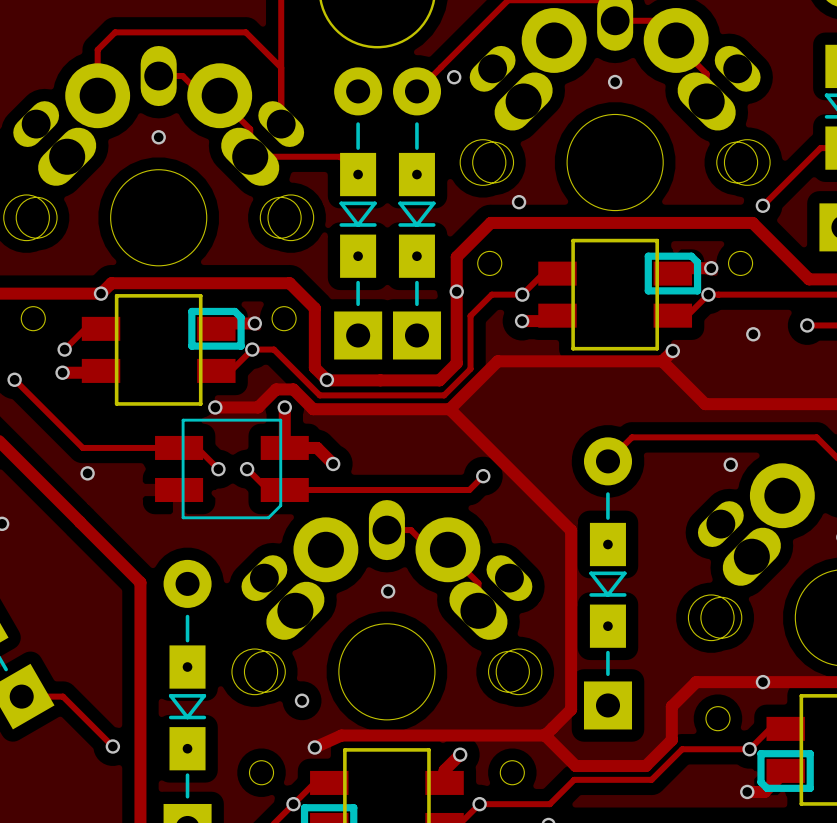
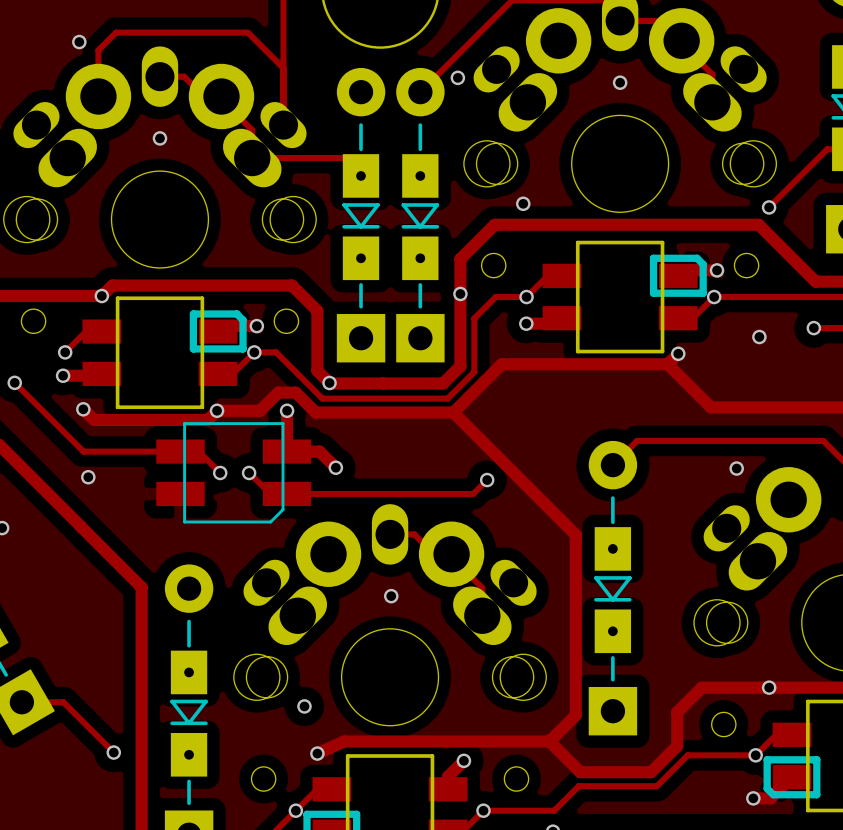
via: none -> (79, 42)
track: none -> (83, 409) (93, 419) (207, 419) (217, 410)
via: none -> (83, 409)

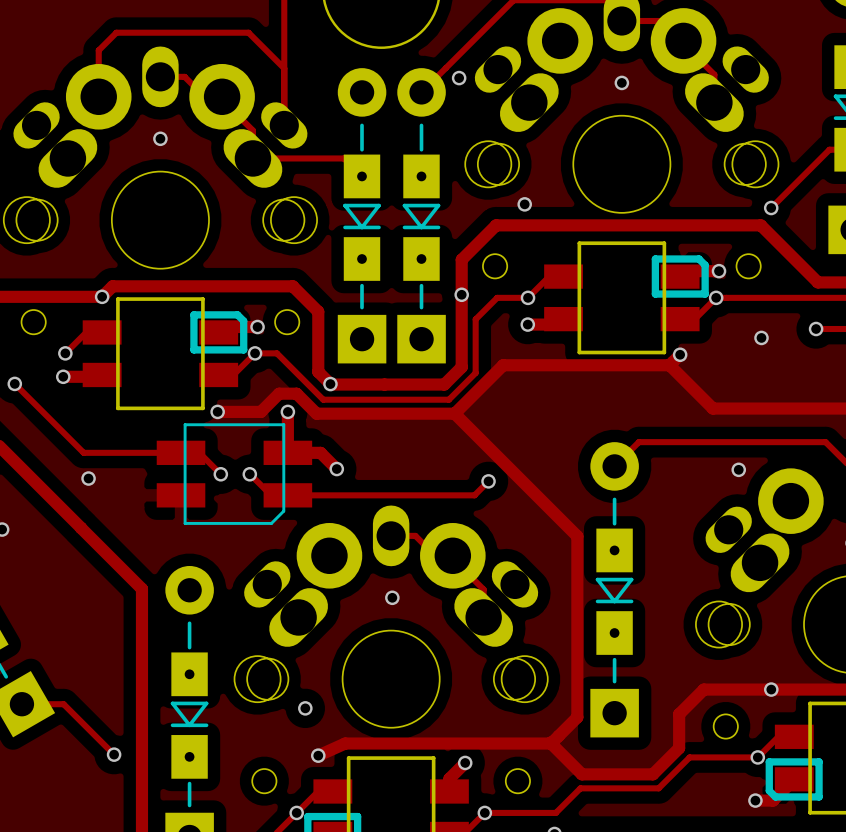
via: (79, 42) -> none
track: (83, 409) (93, 419) (207, 419) (217, 410) -> none
via: (83, 409) -> none

